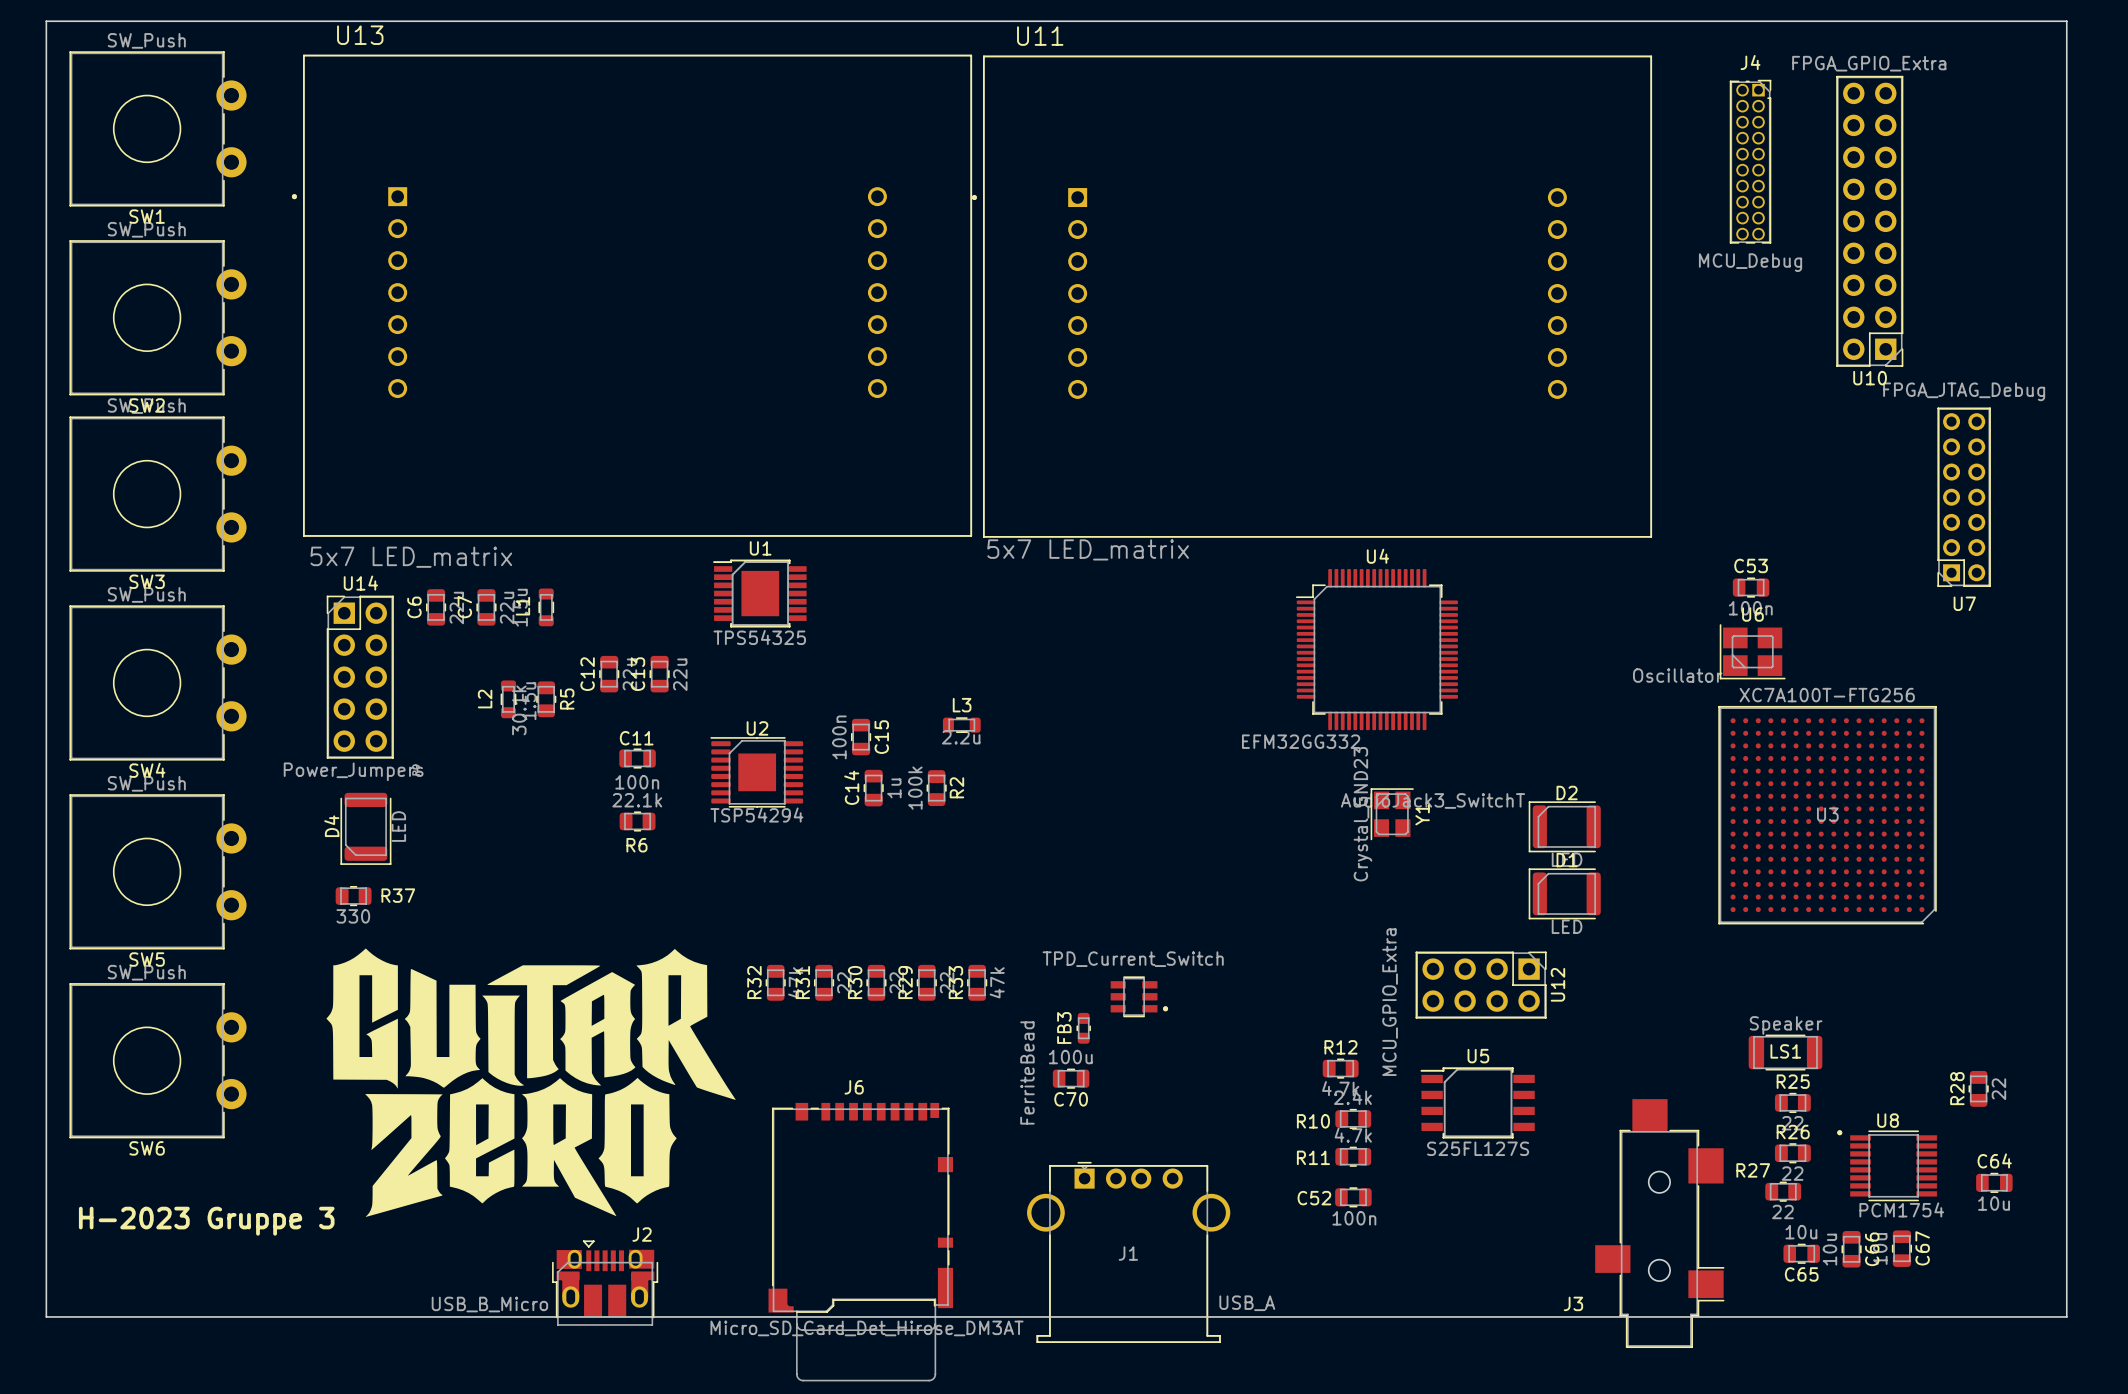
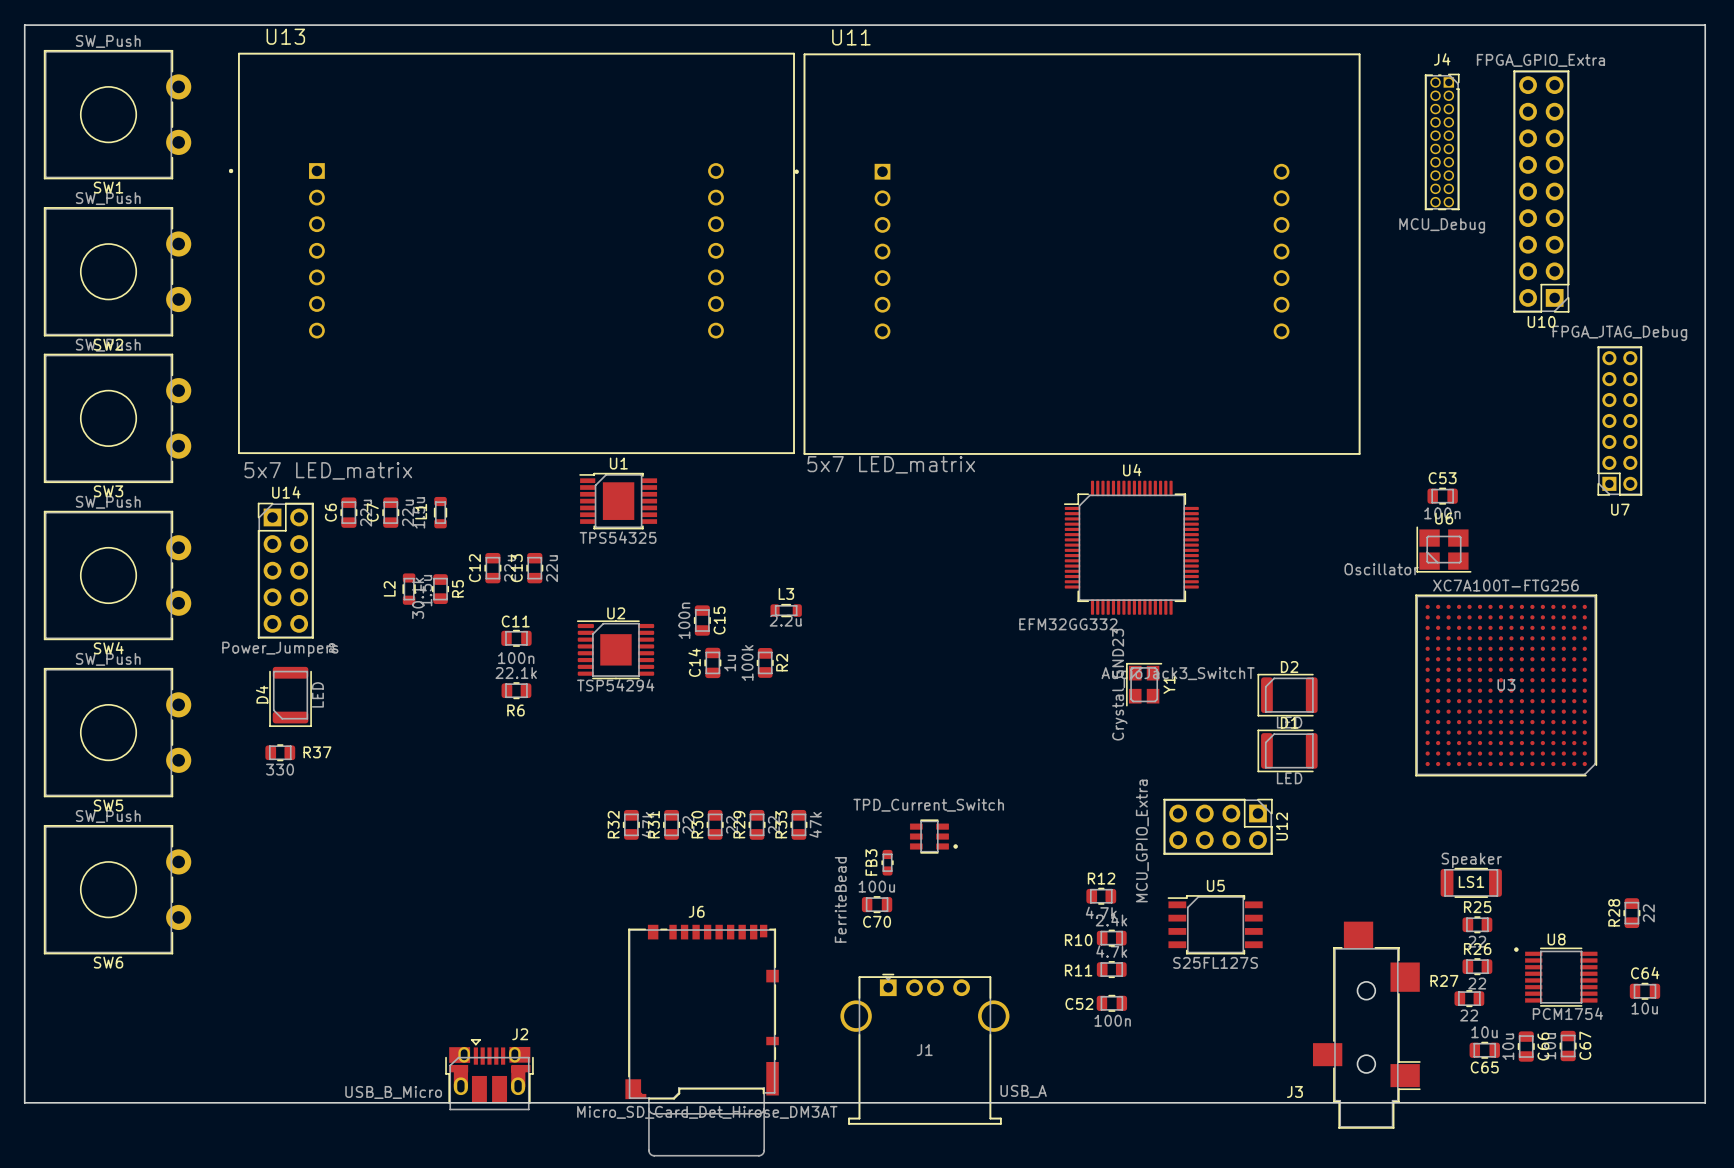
H-2023 Gruppe 3: (531, 1082) -> none

